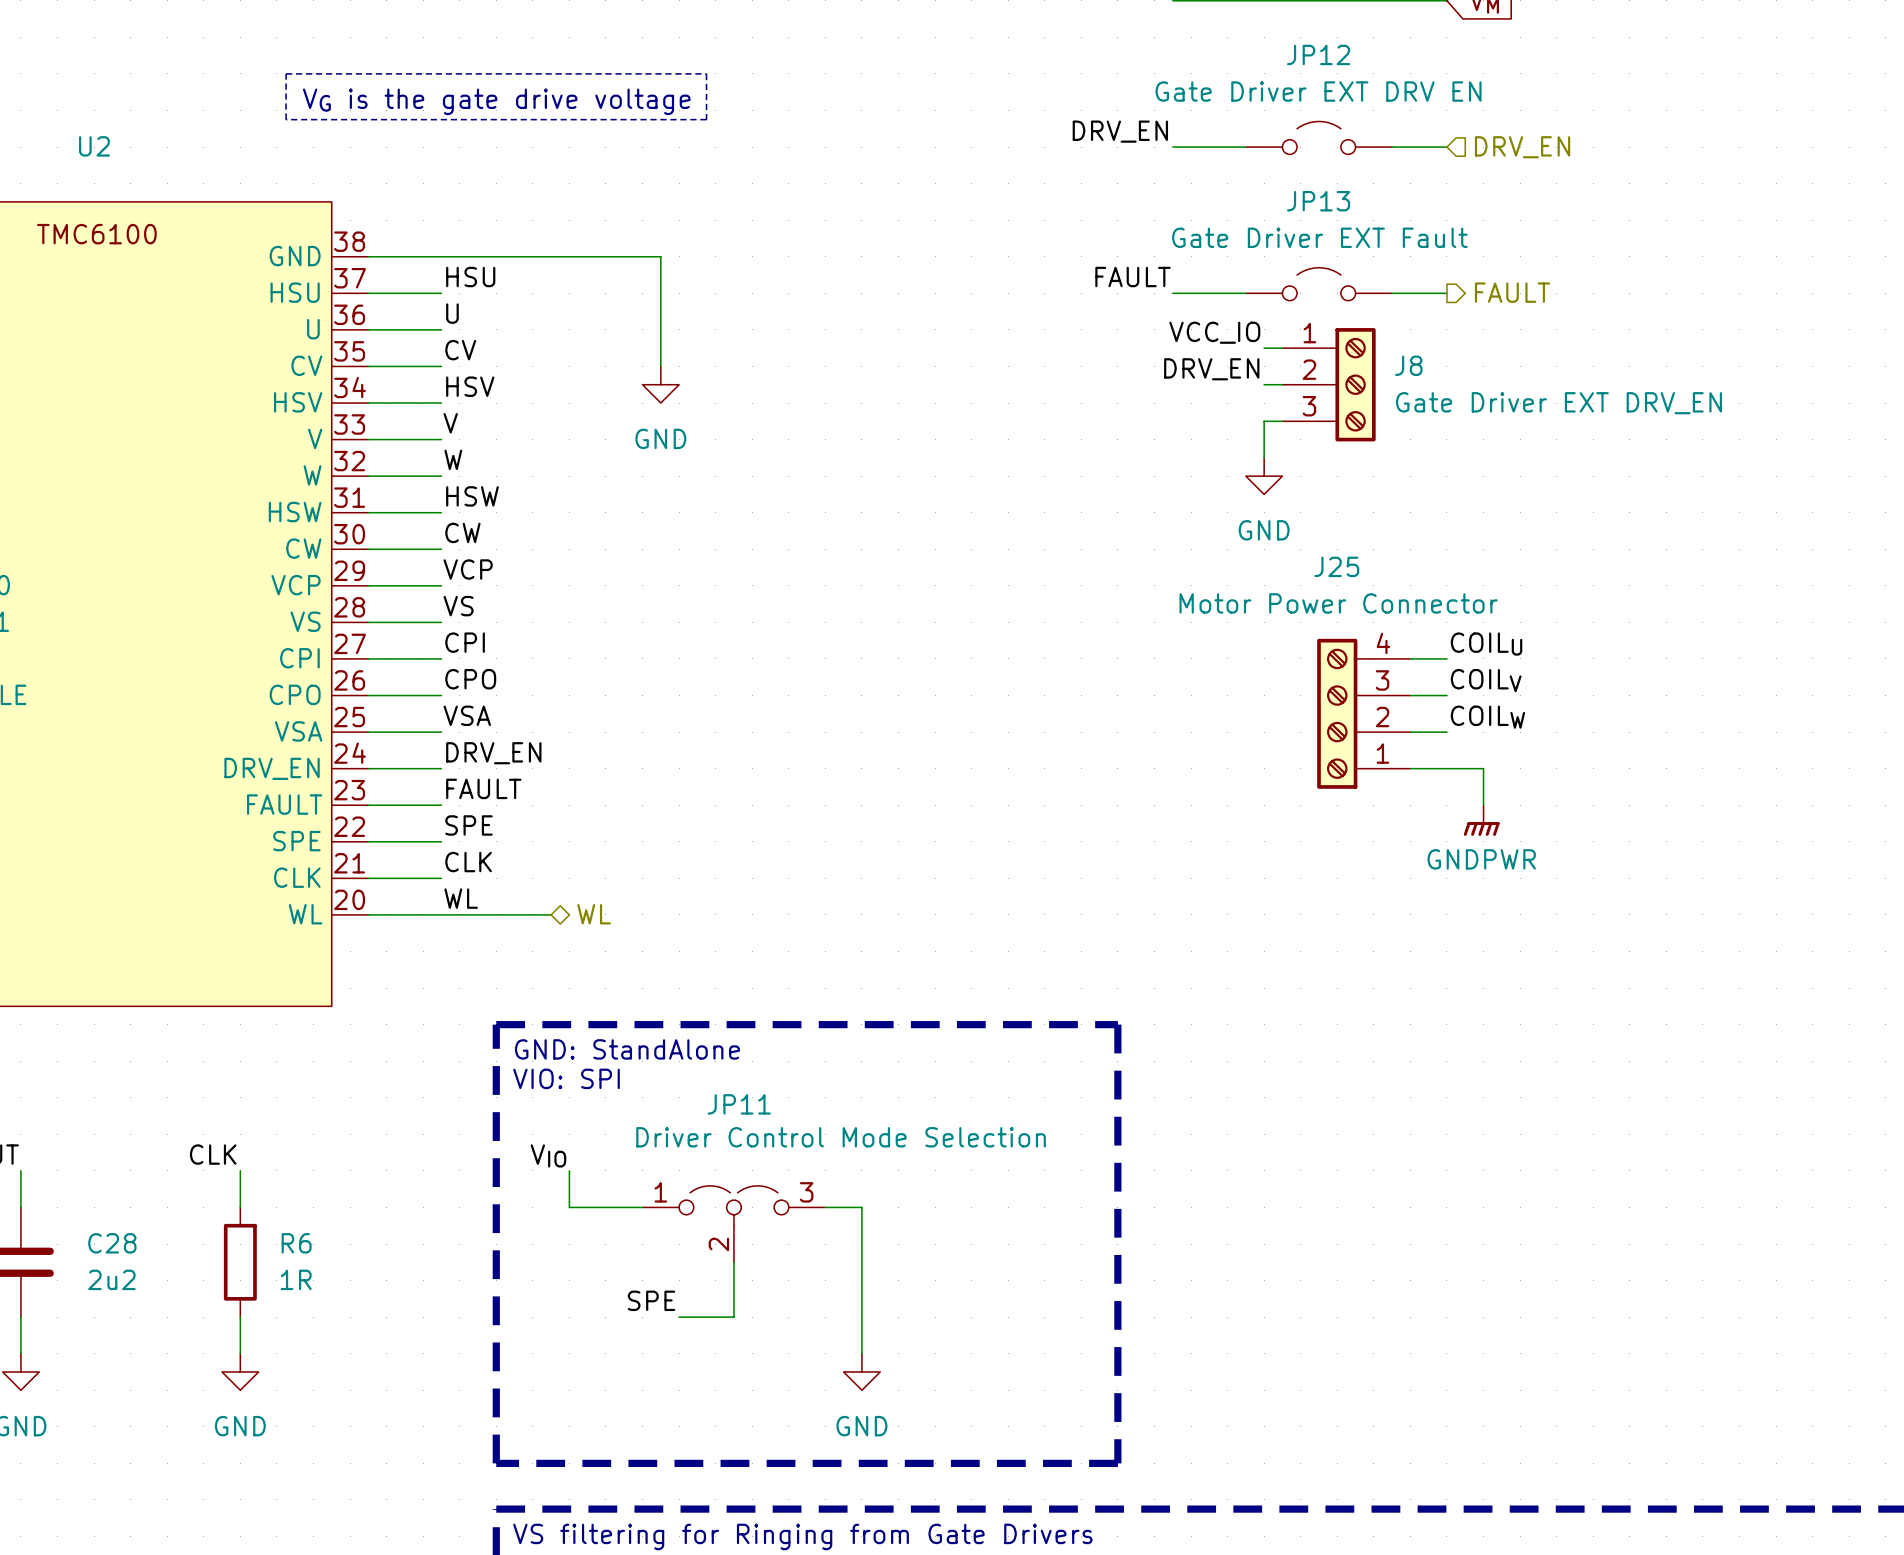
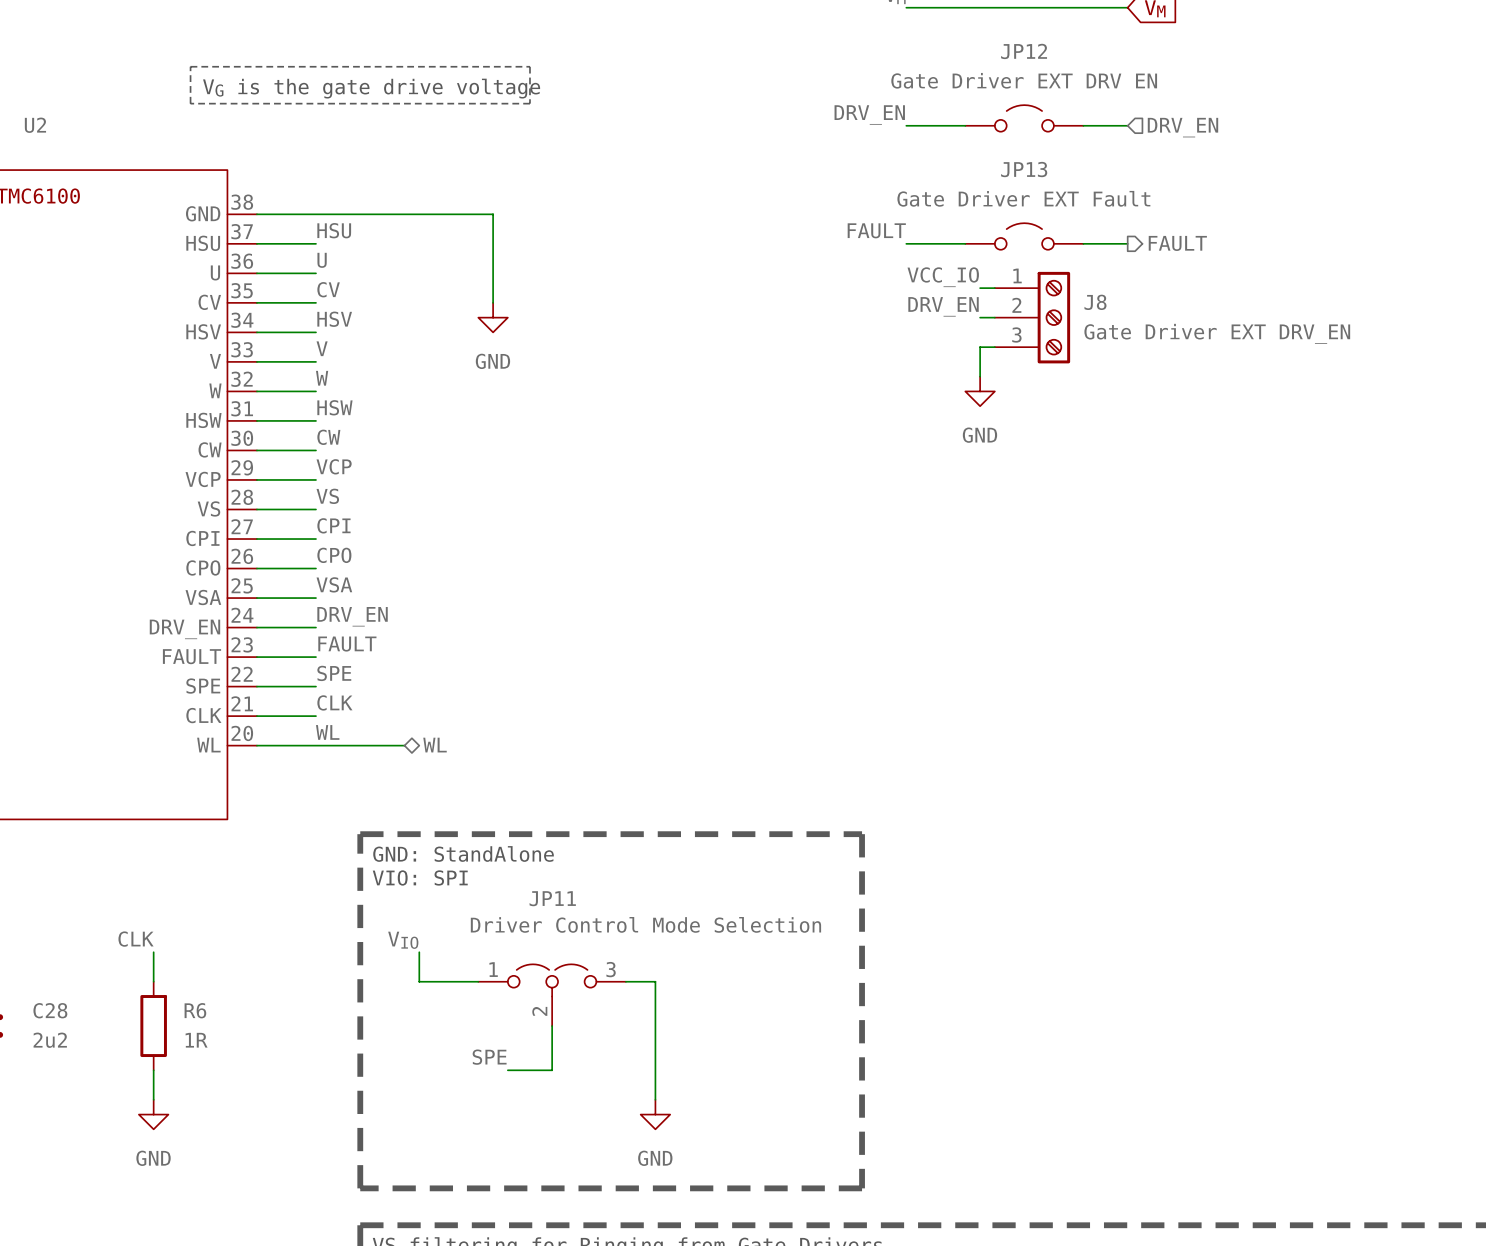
label: COILU (1486, 644) -> none
wire: (1410, 658) (1446, 658) -> none
label: COILV (1486, 680) -> none
wire: (1410, 695) (1446, 695) -> none
J25: Motor Power Connector (1363, 713) -> none
label: COILW (1487, 717) -> none
wire: (1410, 732) (1446, 732) -> none
wire: (1410, 768) (1483, 768) (1483, 805) -> none
power symbol: GNDPWR (1481, 820) -> none

